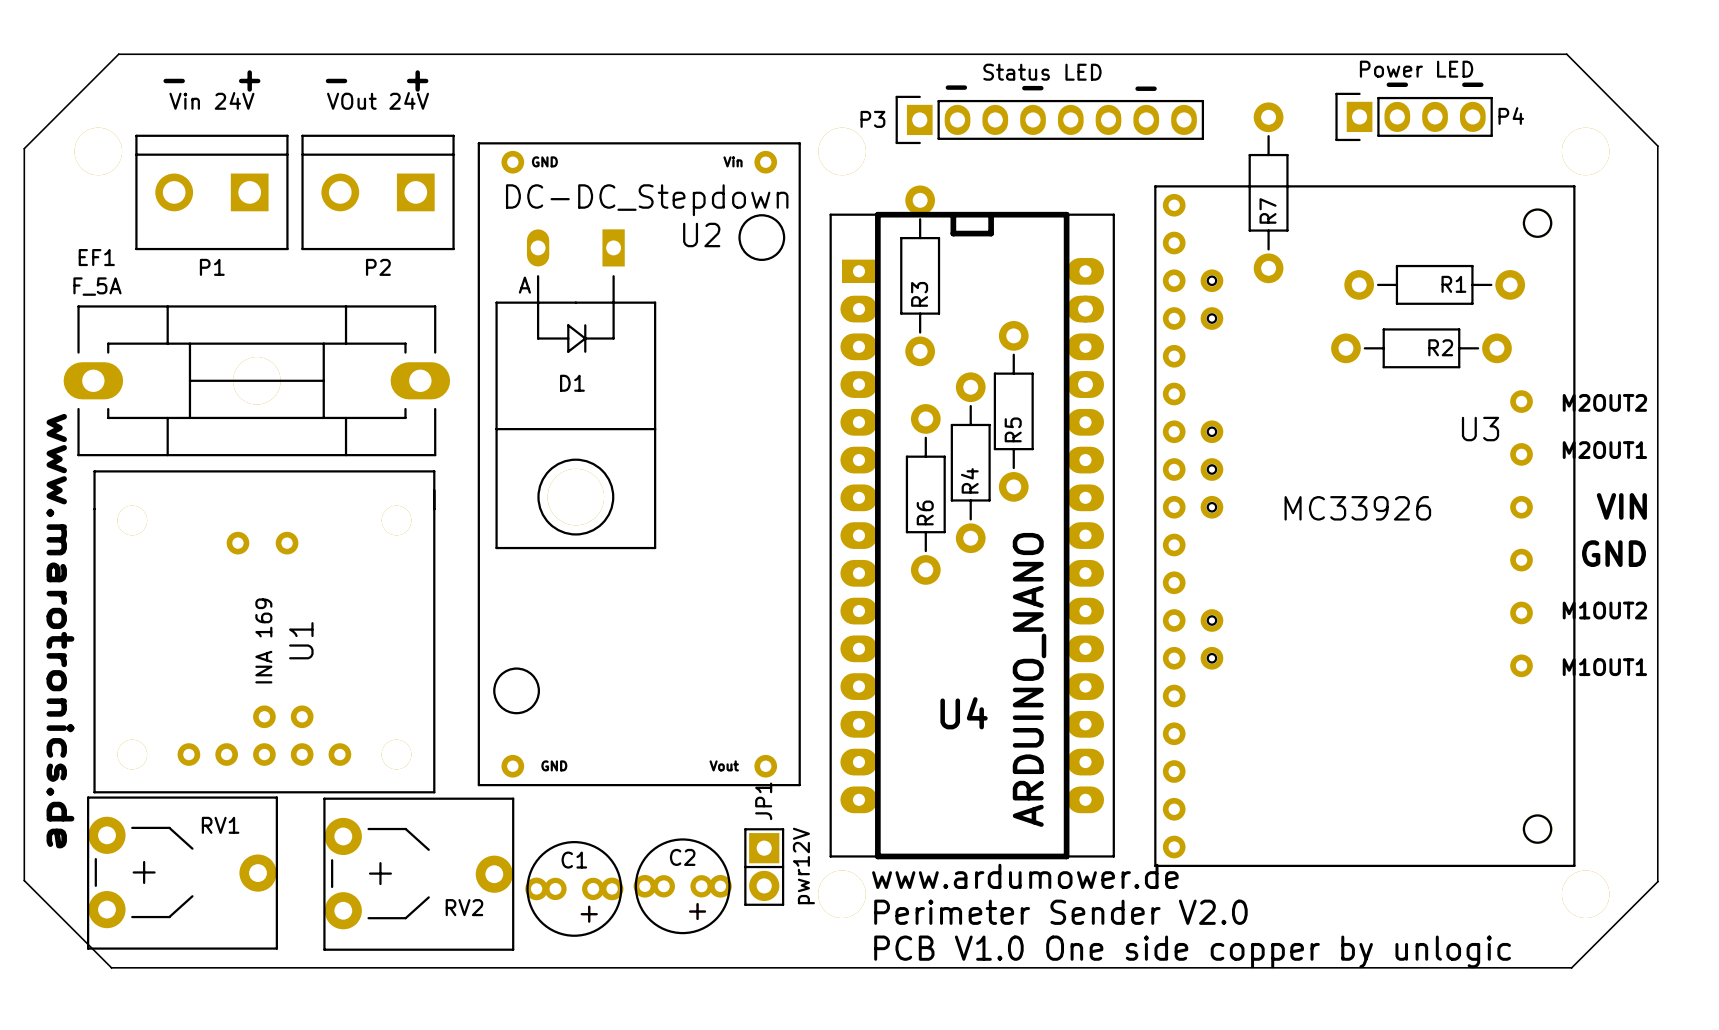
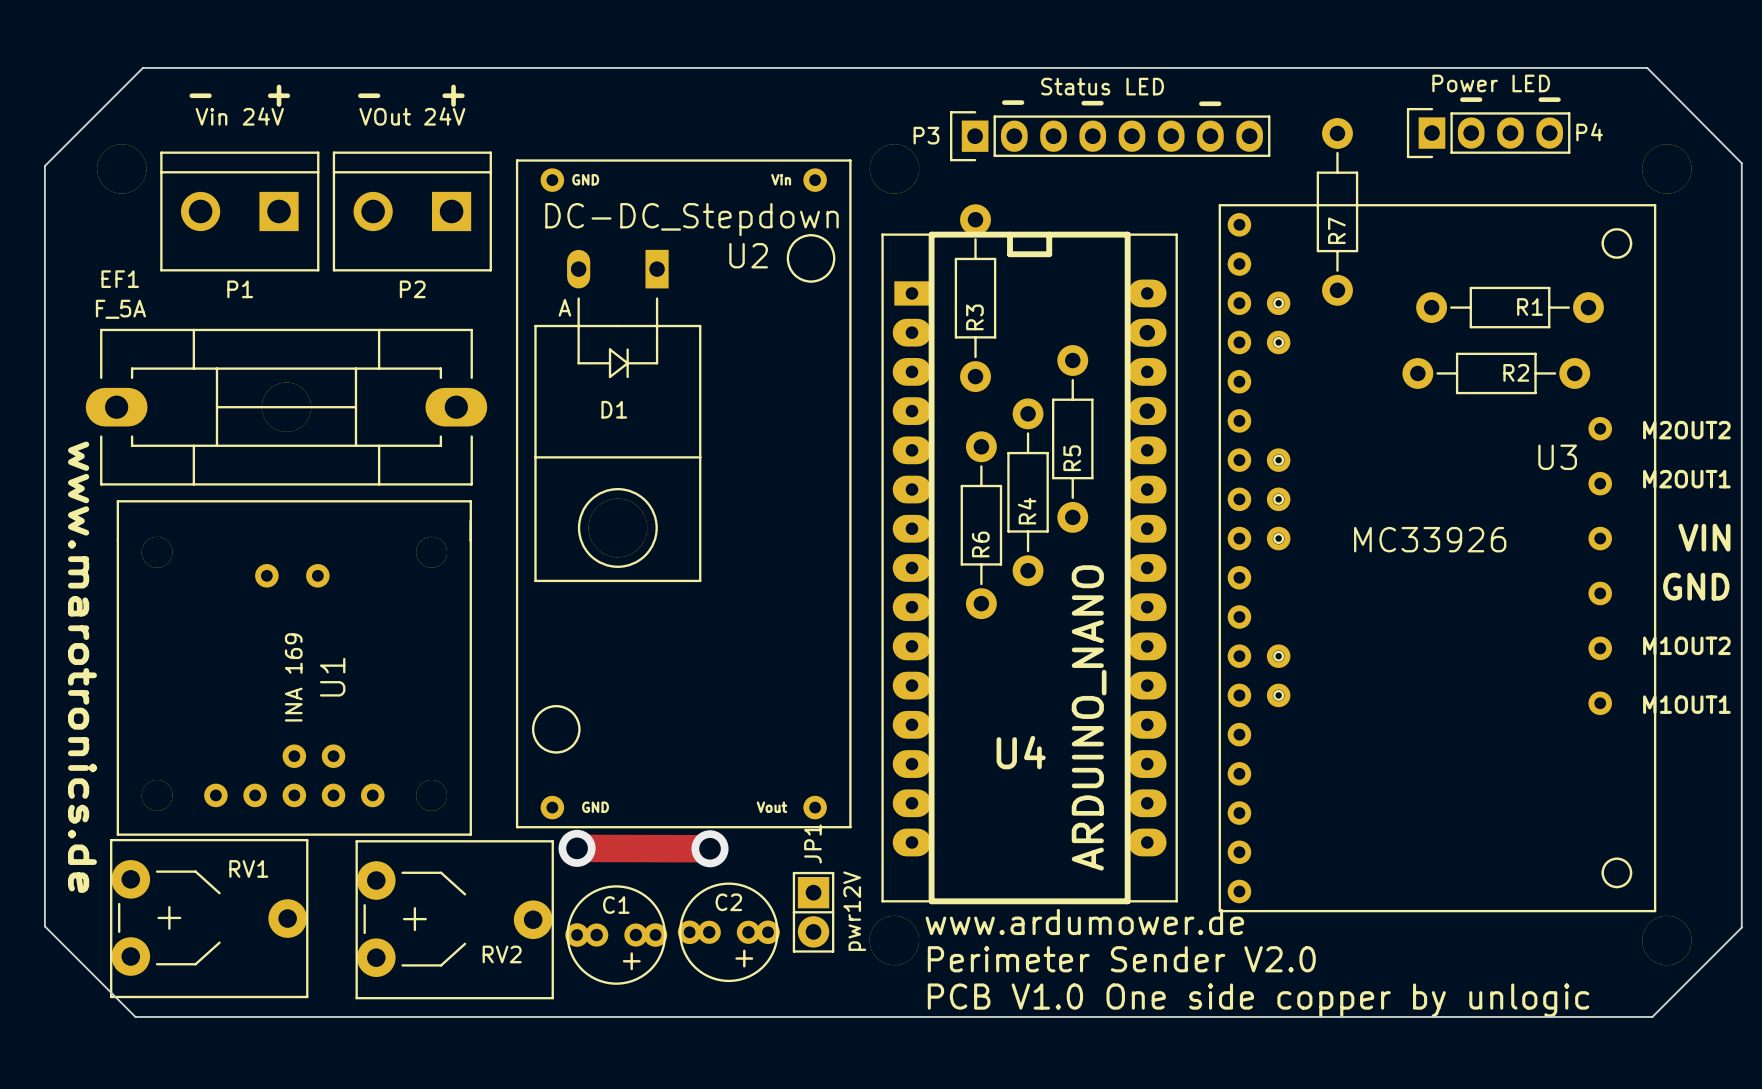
track: none -> (577, 848) (710, 848)
via: none -> (577, 848)
via: none -> (710, 848)

